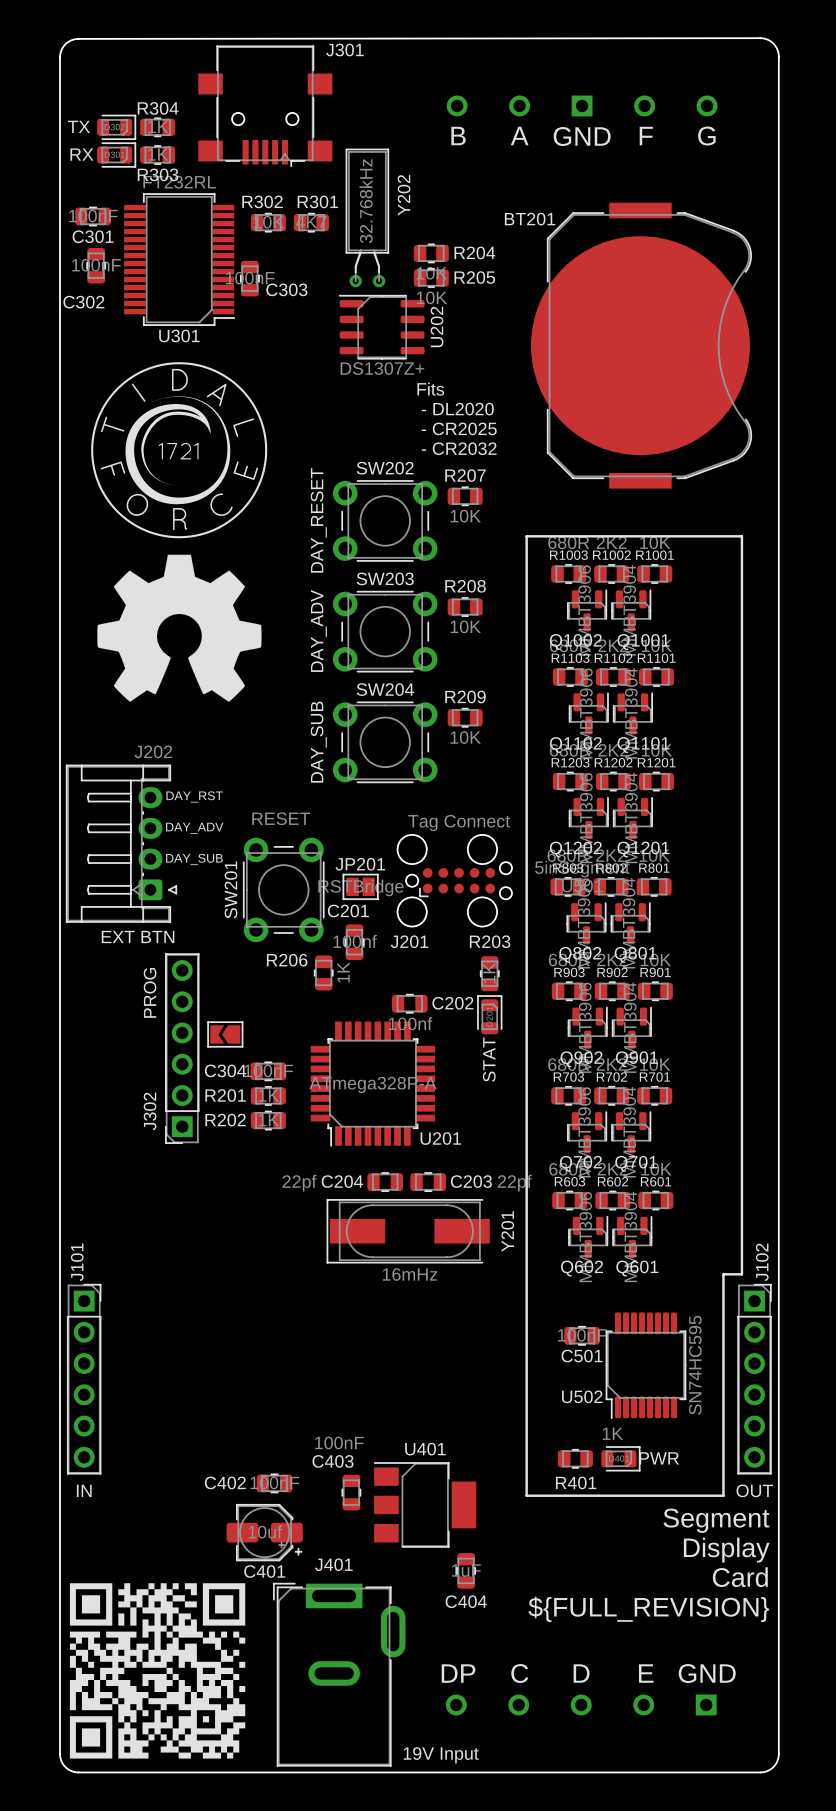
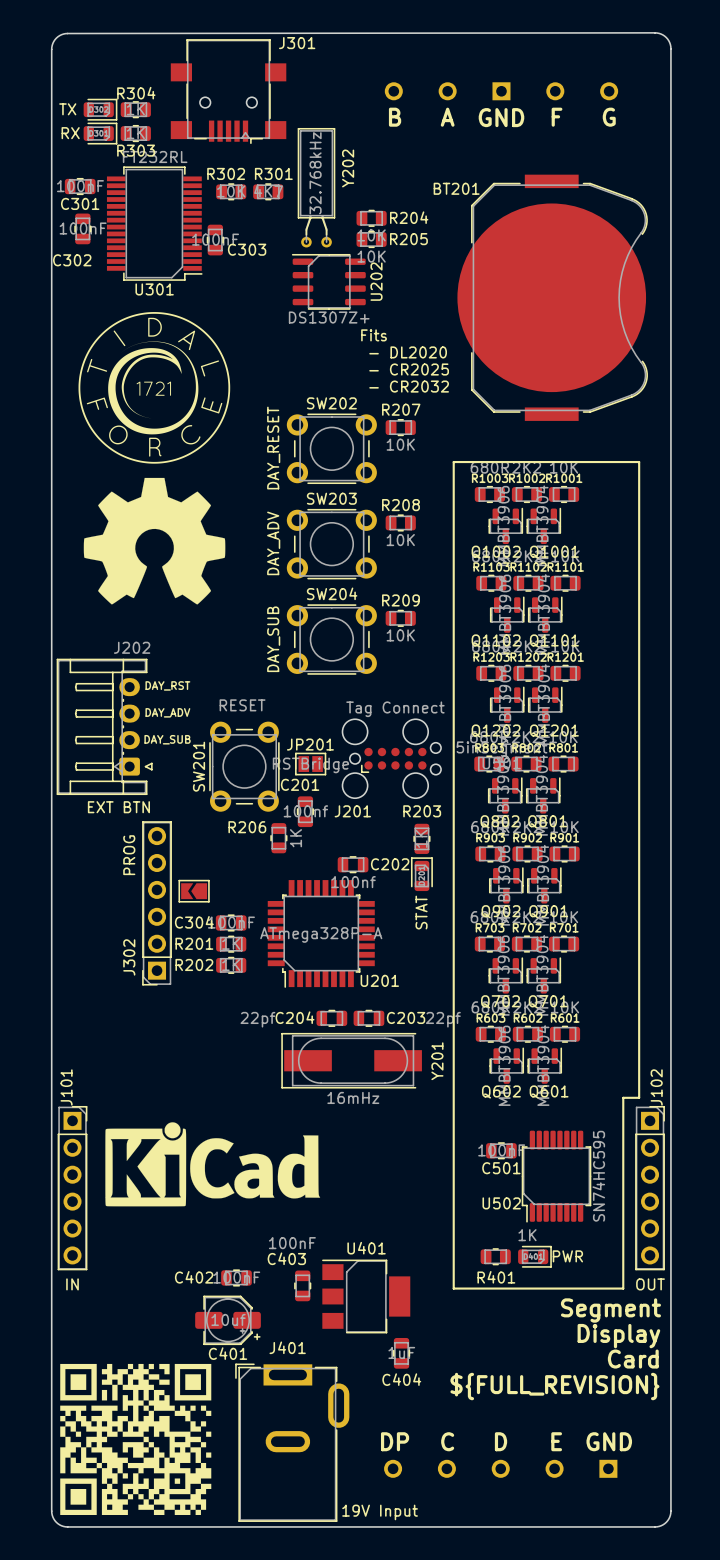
drawing: none -> [105, 1122, 321, 1207]

